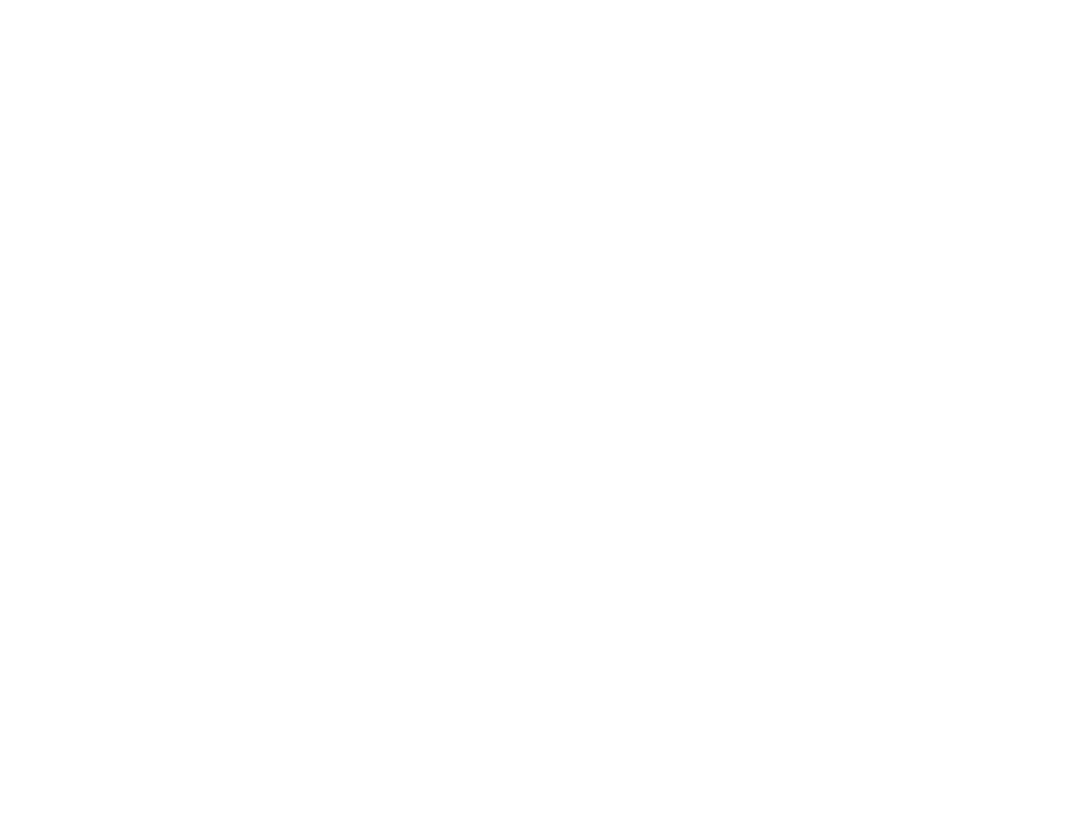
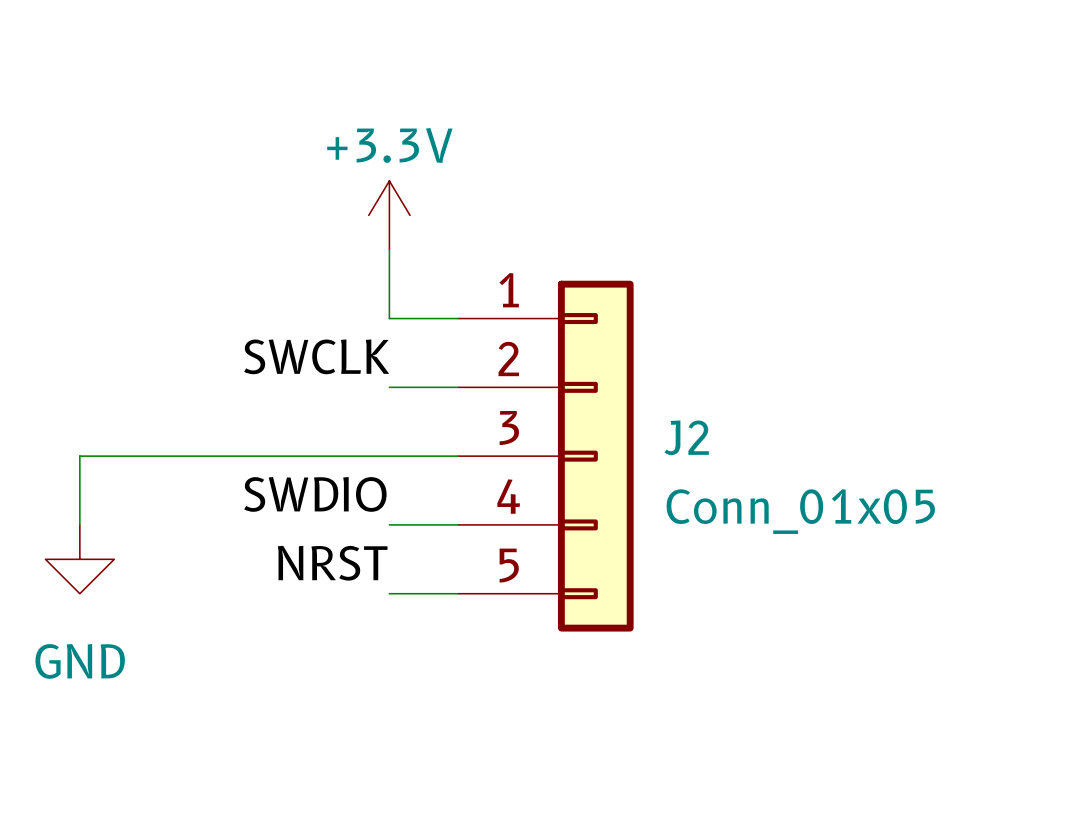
power symbol: none -> +3.3V (389, 215)
wire: none -> (389, 249) (389, 318) (458, 318)
label: none -> SWCLK (316, 356)
wire: none -> (389, 387) (458, 387)
wire: none -> (458, 456) (79, 456) (79, 524)
J2: none -> Conn_01x05 (545, 456)
label: none -> SWDIO (315, 494)
wire: none -> (389, 524) (458, 524)
power symbol: none -> GND (79, 559)
label: none -> NRST (332, 563)
wire: none -> (389, 593) (458, 593)

